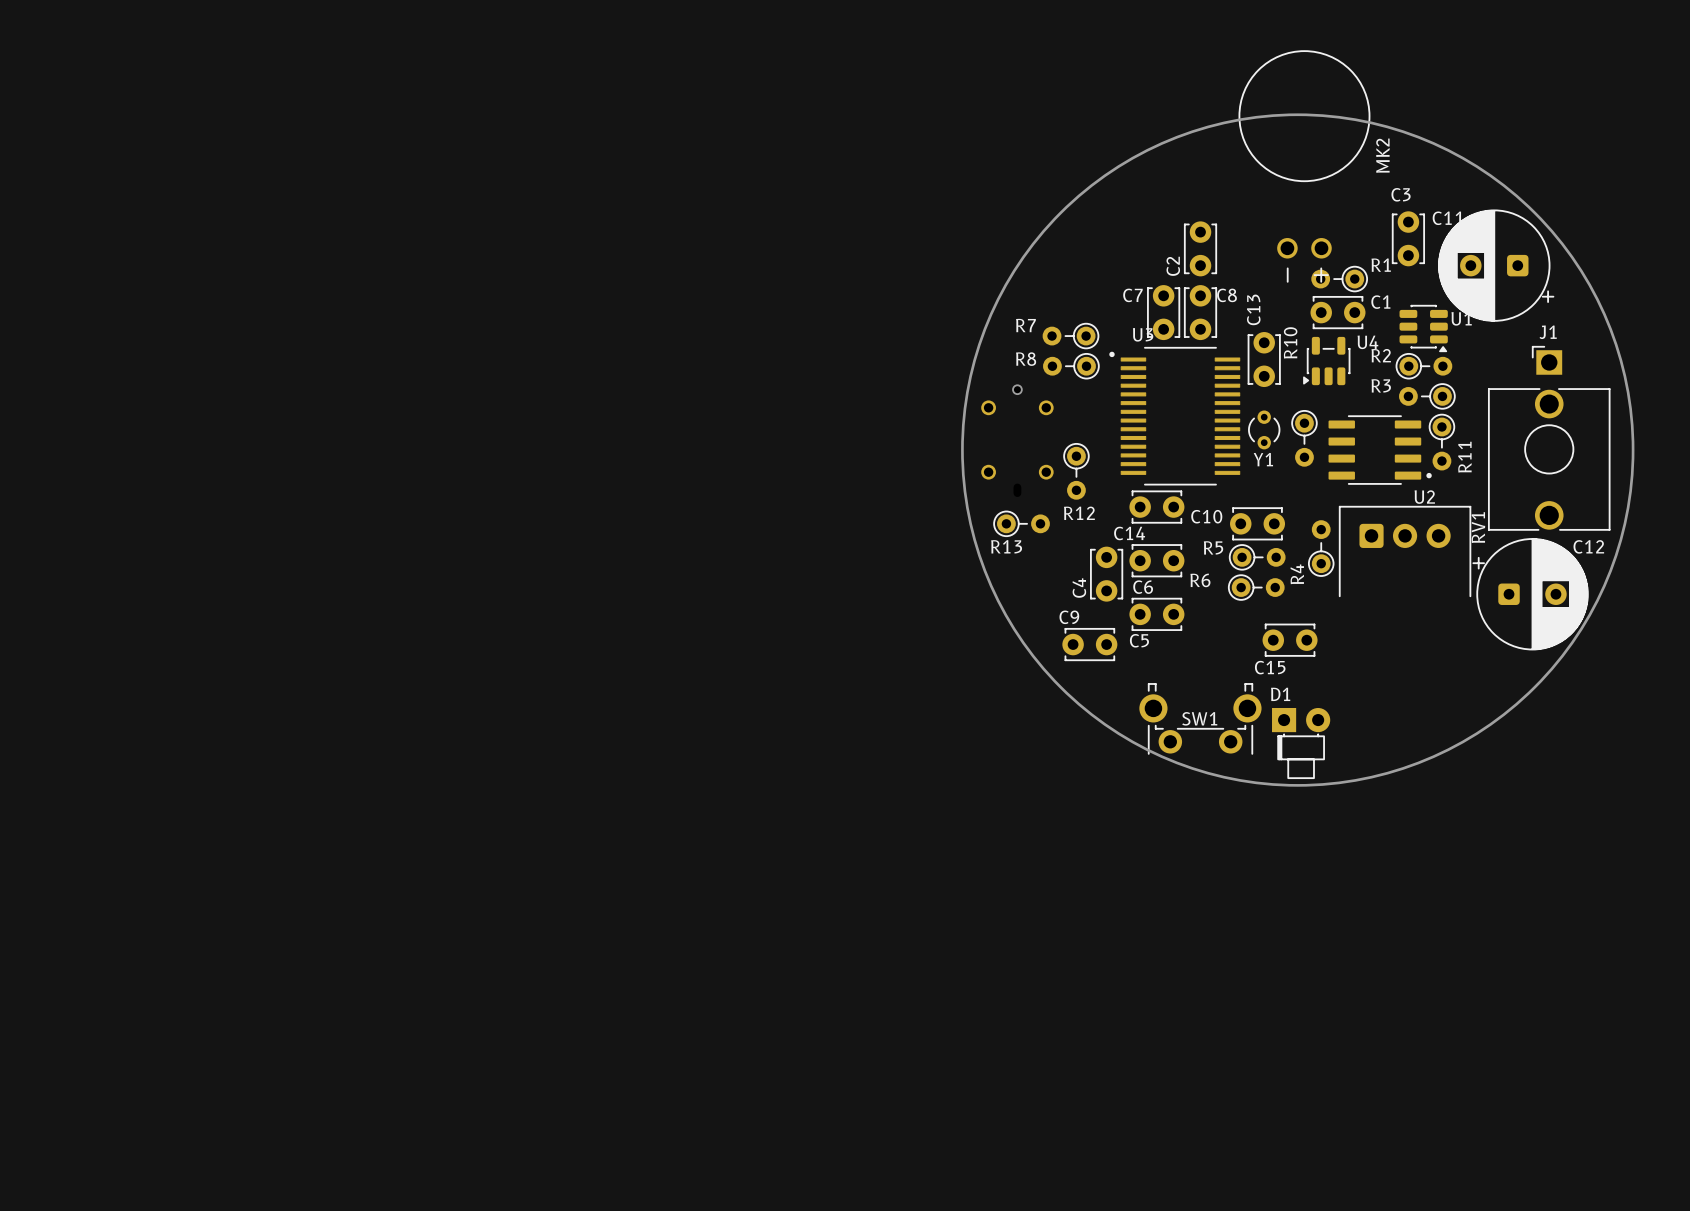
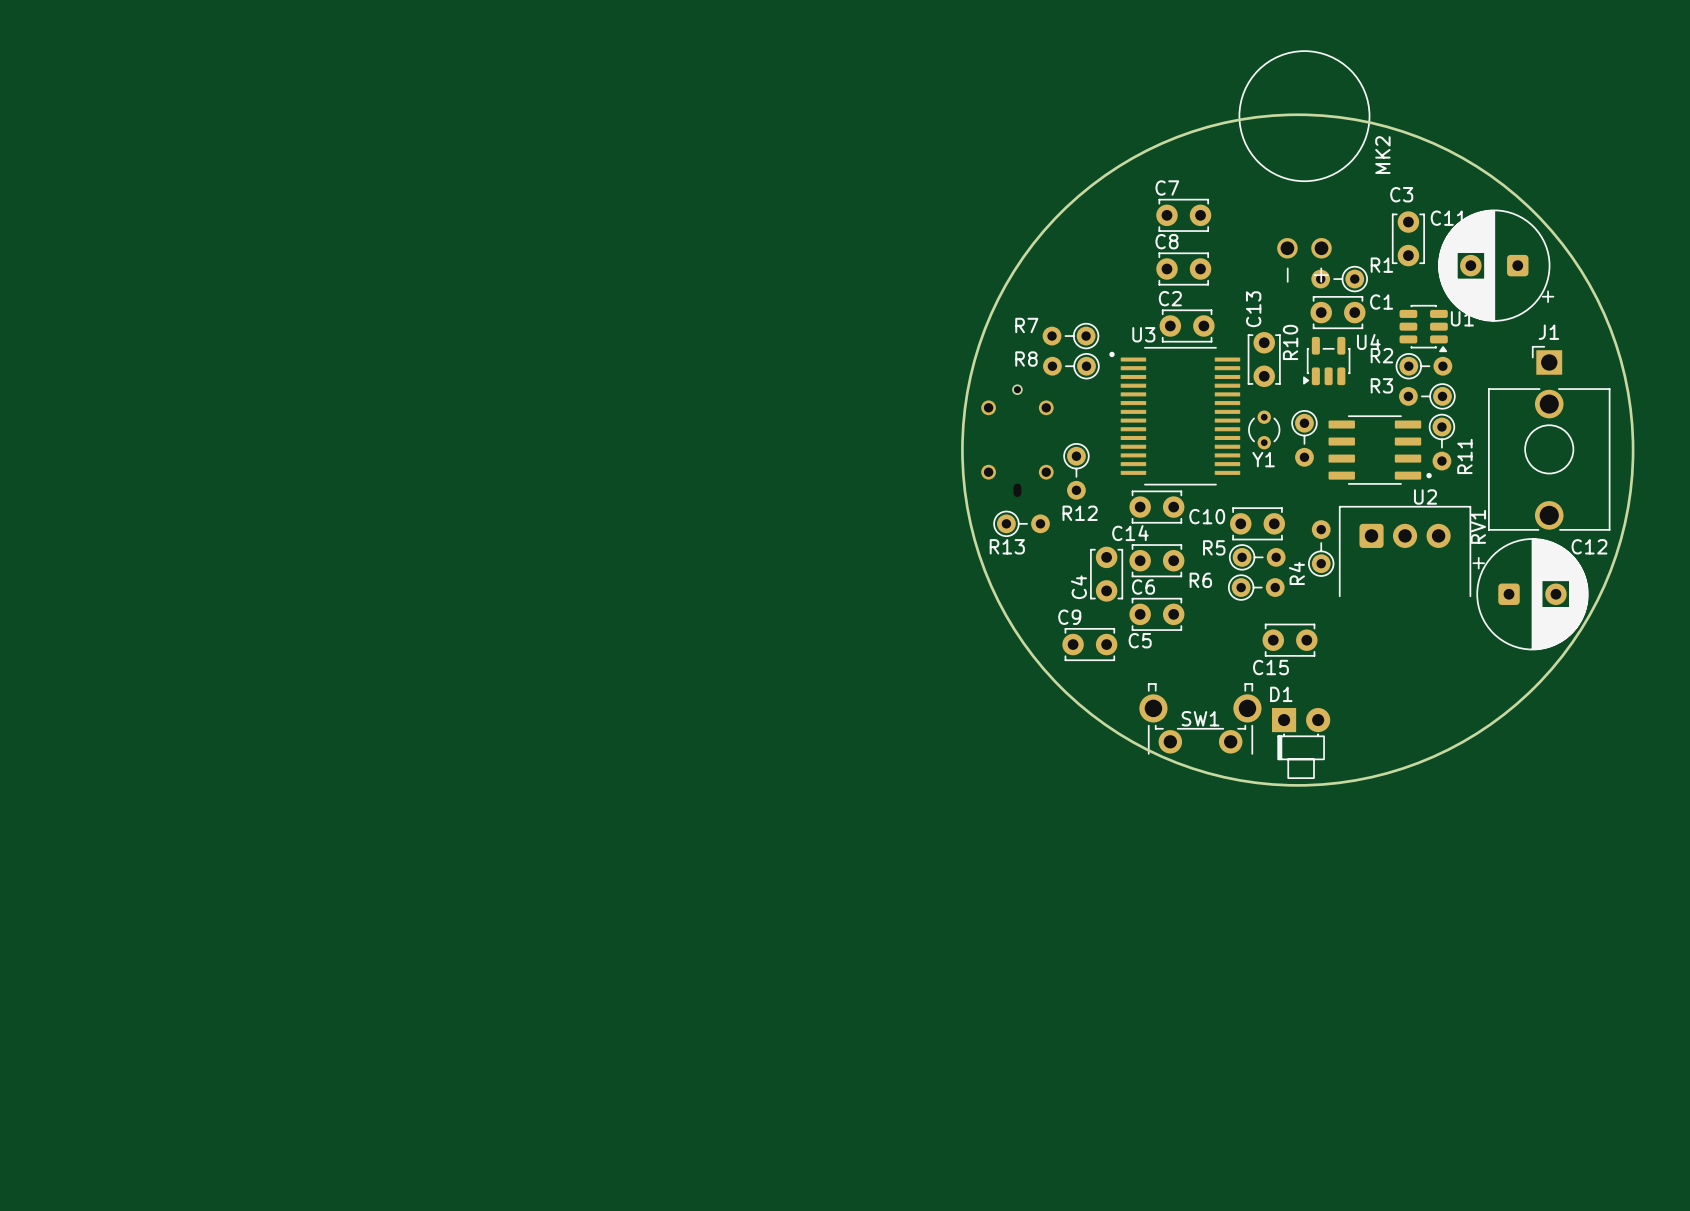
C2 rotation: 0° (1200, 248) -> 90° clockwise (1187, 325)
C2 position: (1200, 248) -> (1187, 325)
C8 name position: C8 (1226, 295) -> C8 (1166, 241)
C7 rotation: 0° (1163, 312) -> 90° clockwise (1183, 215)
C7 position: (1163, 312) -> (1183, 215)
C8 rotation: 0° (1200, 312) -> 90° clockwise (1183, 268)
C8 position: (1200, 312) -> (1183, 268)

